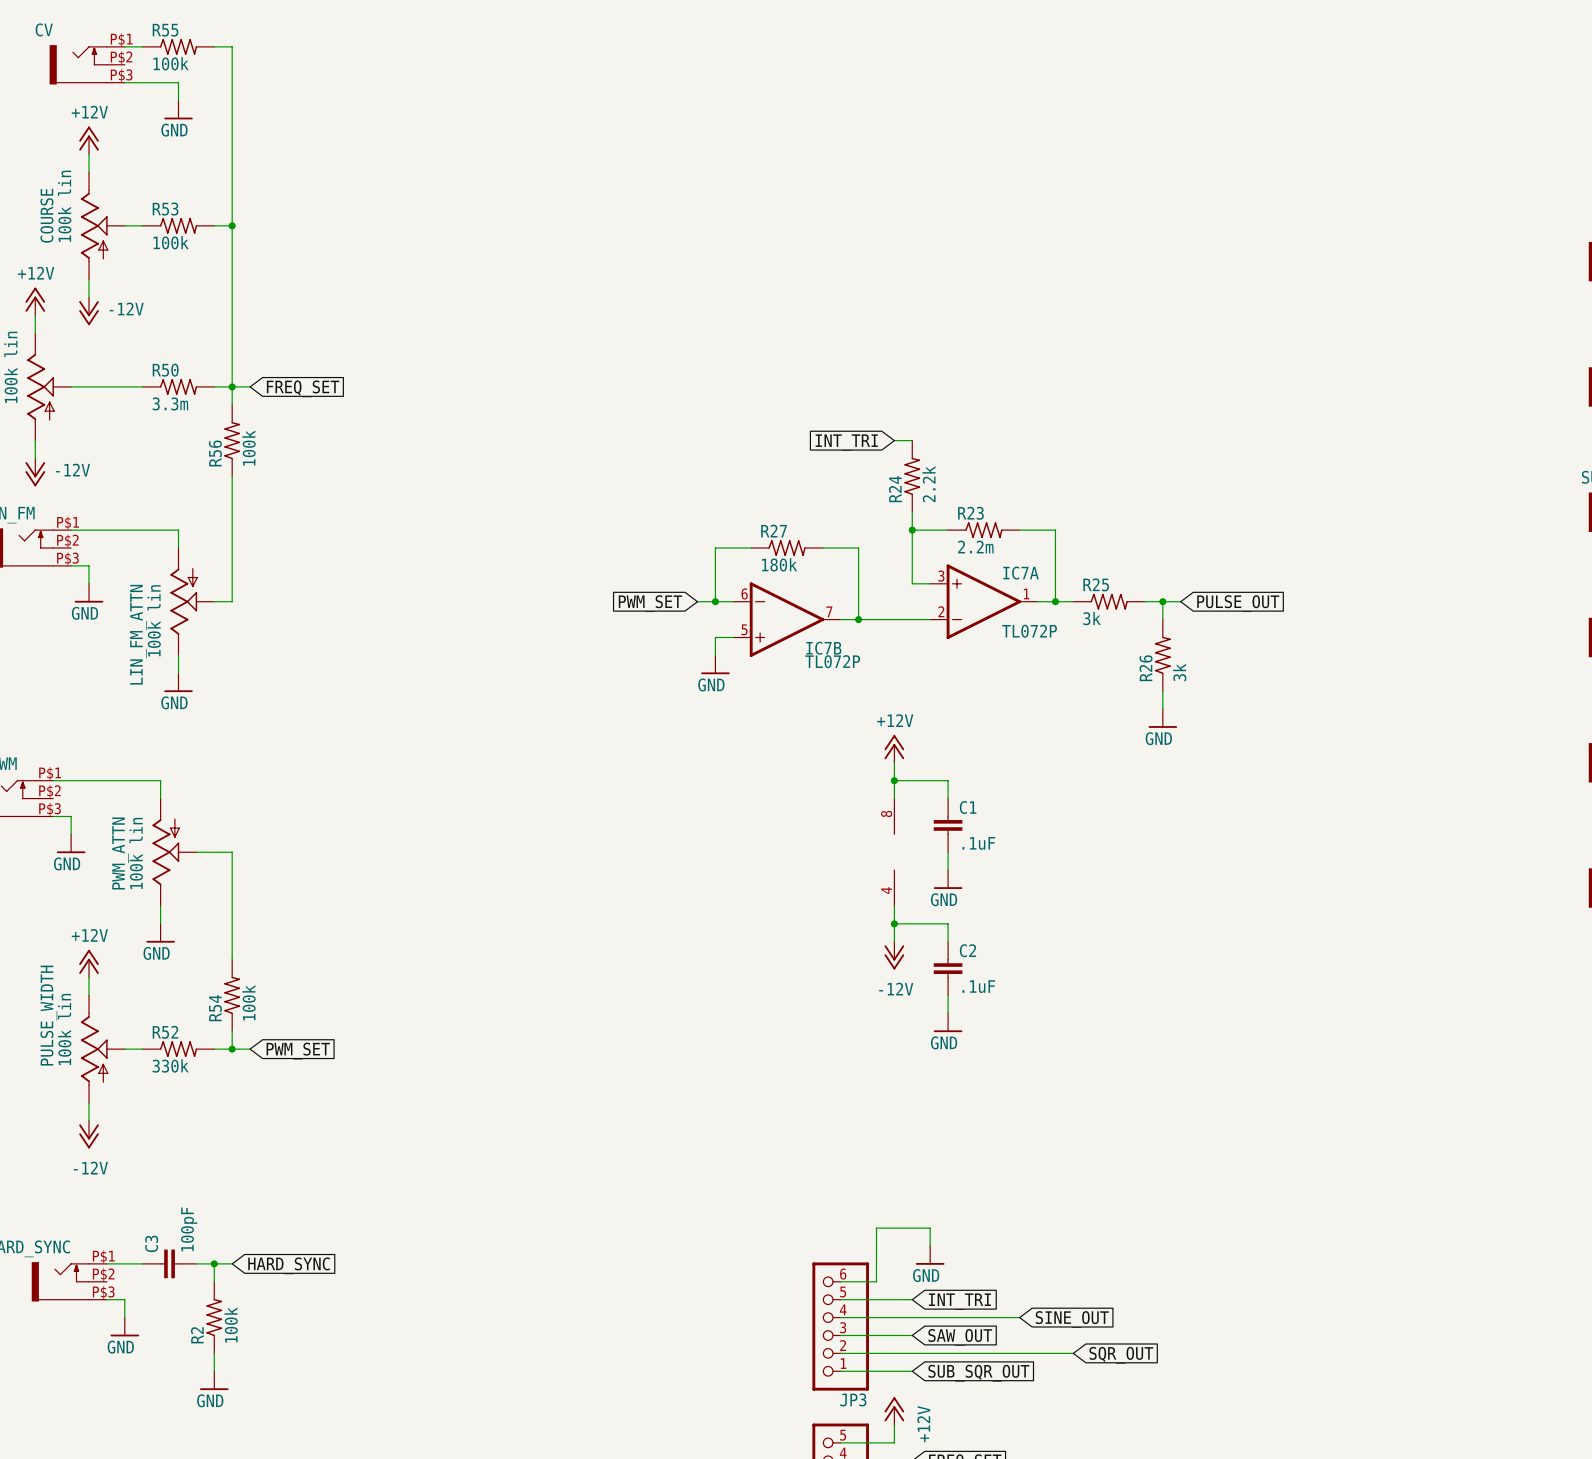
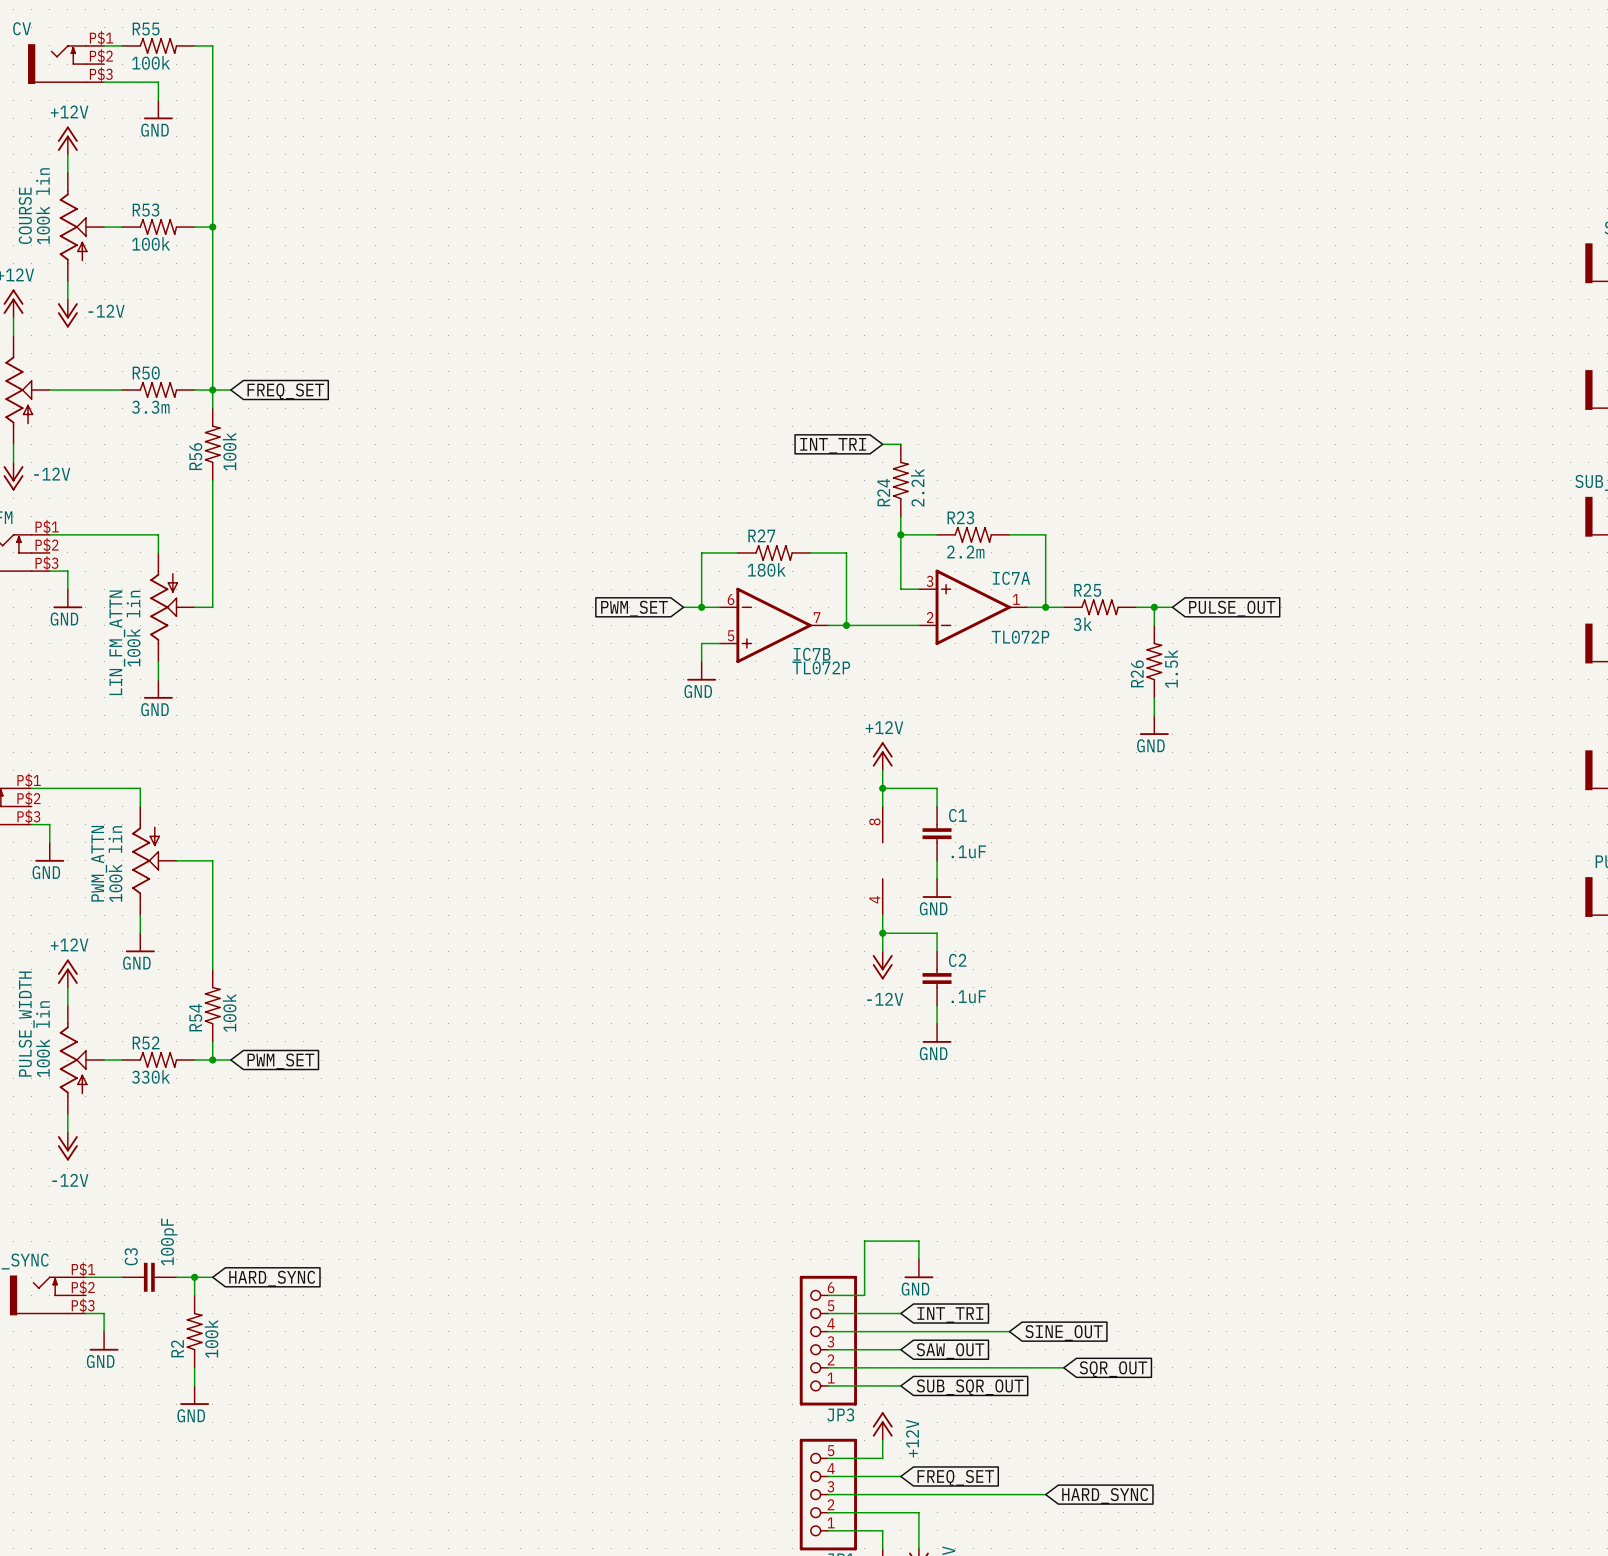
R26 value: 3k (1179, 672) -> 1.5k (1171, 668)

